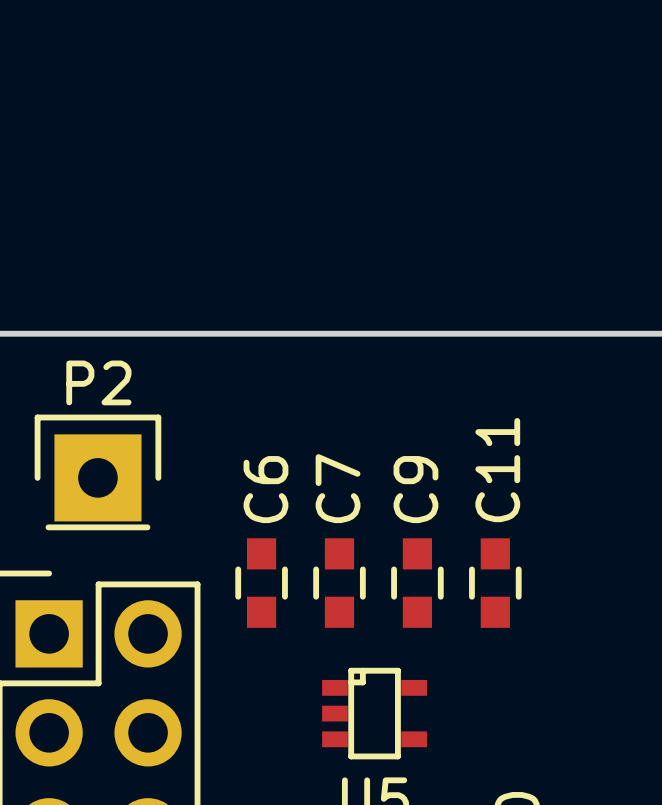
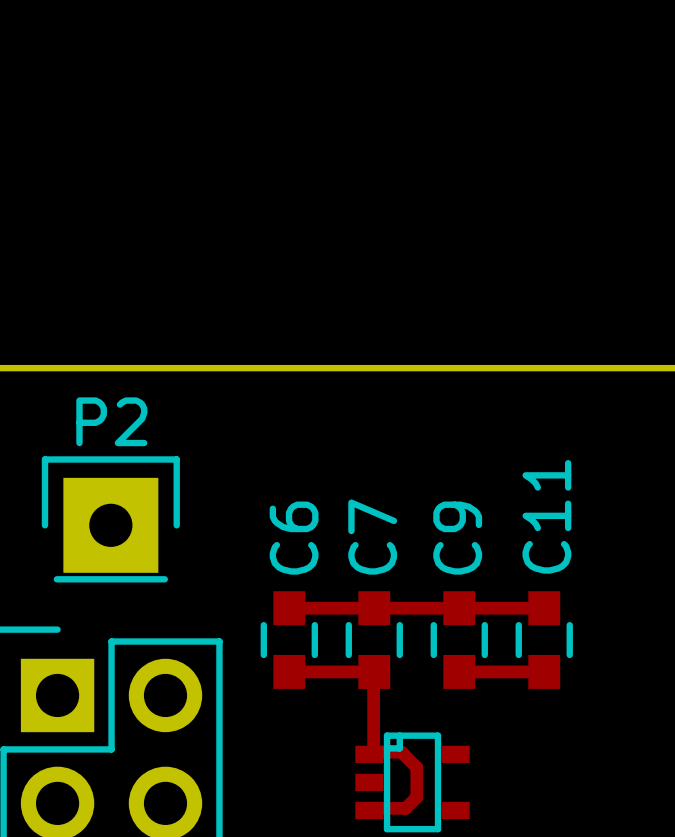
top track: none -> (289, 608) (544, 608)
top track: none -> (289, 671) (374, 671) (373, 752) (401, 752) (416, 767) (416, 797) (405, 808) (373, 808)
top track: none -> (459, 671) (544, 671)

